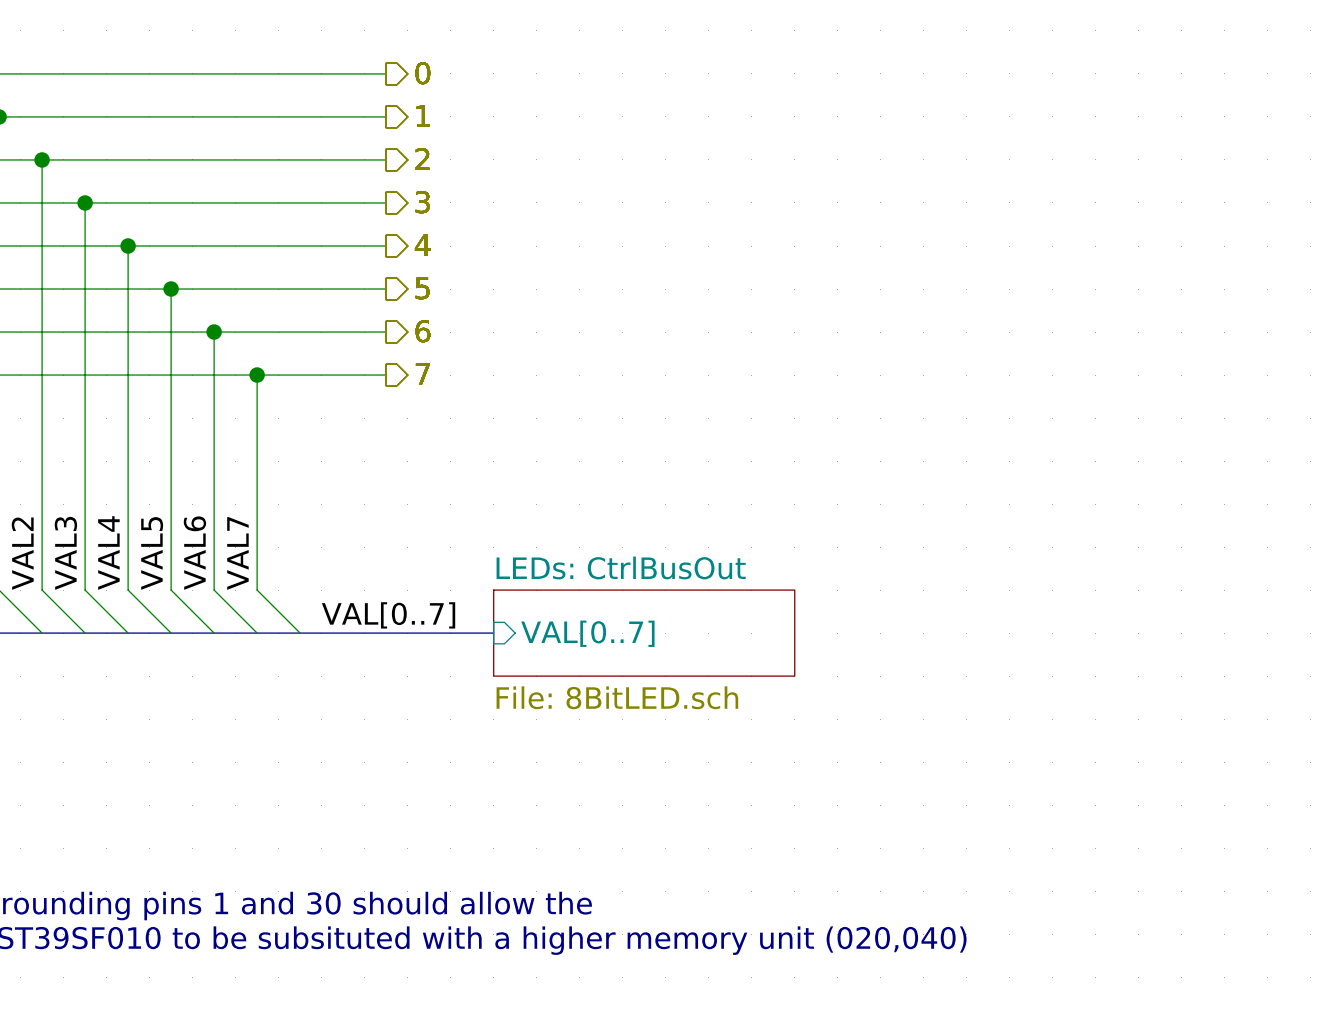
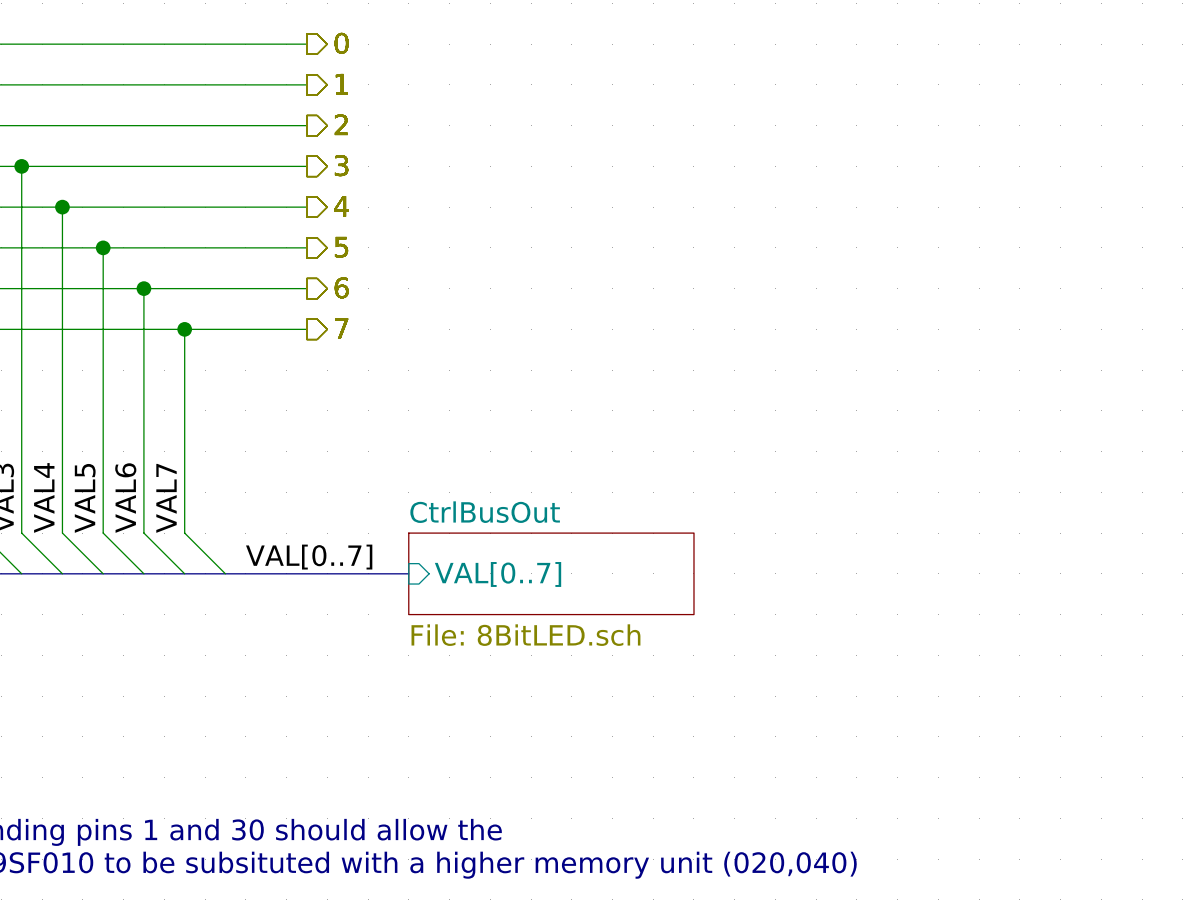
sheet CtrlBusOut name: LEDs: CtrlBusOut (621, 567) -> CtrlBusOut (485, 512)

